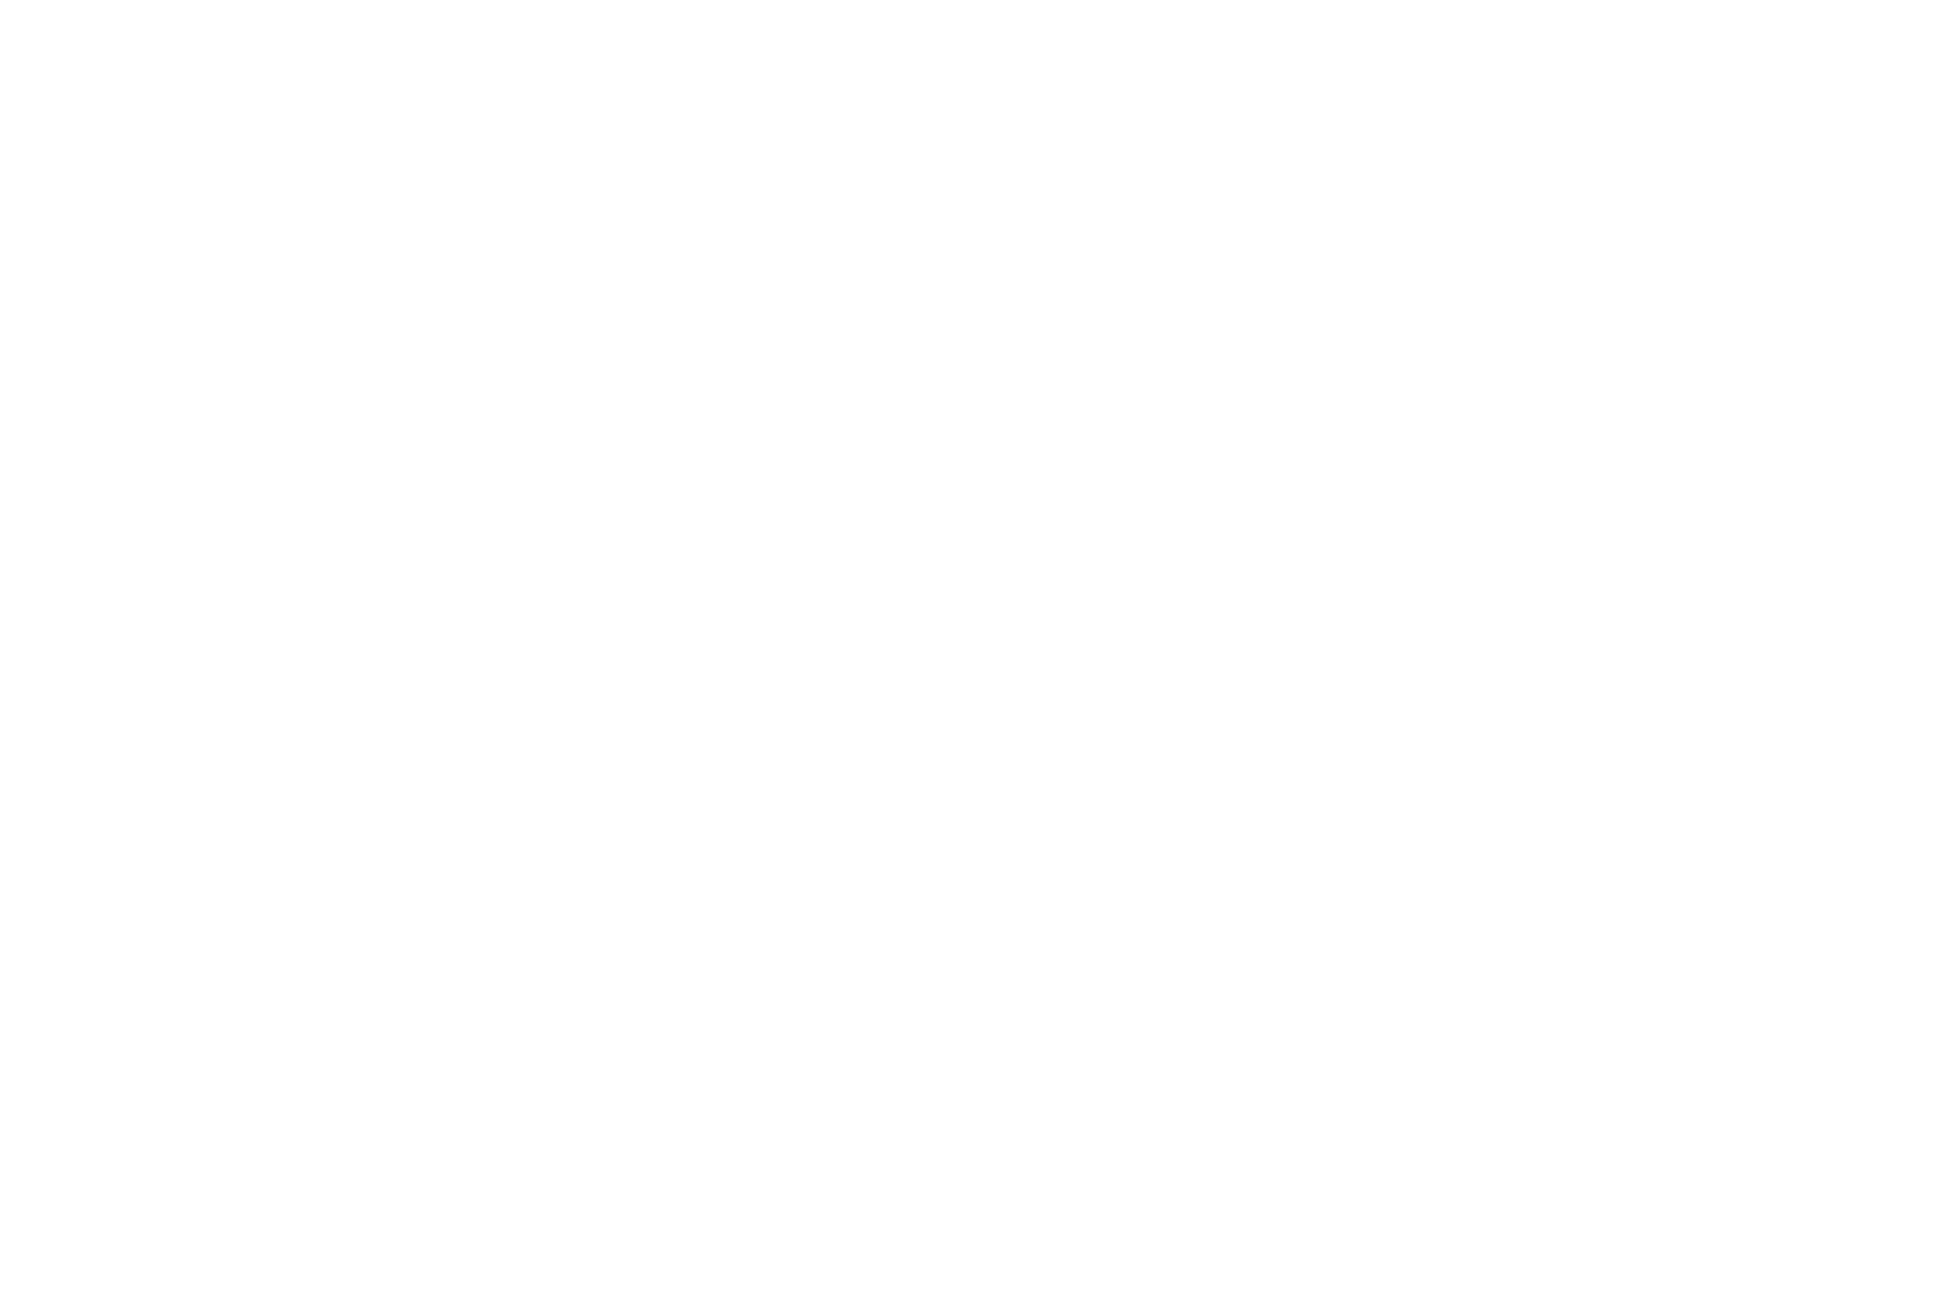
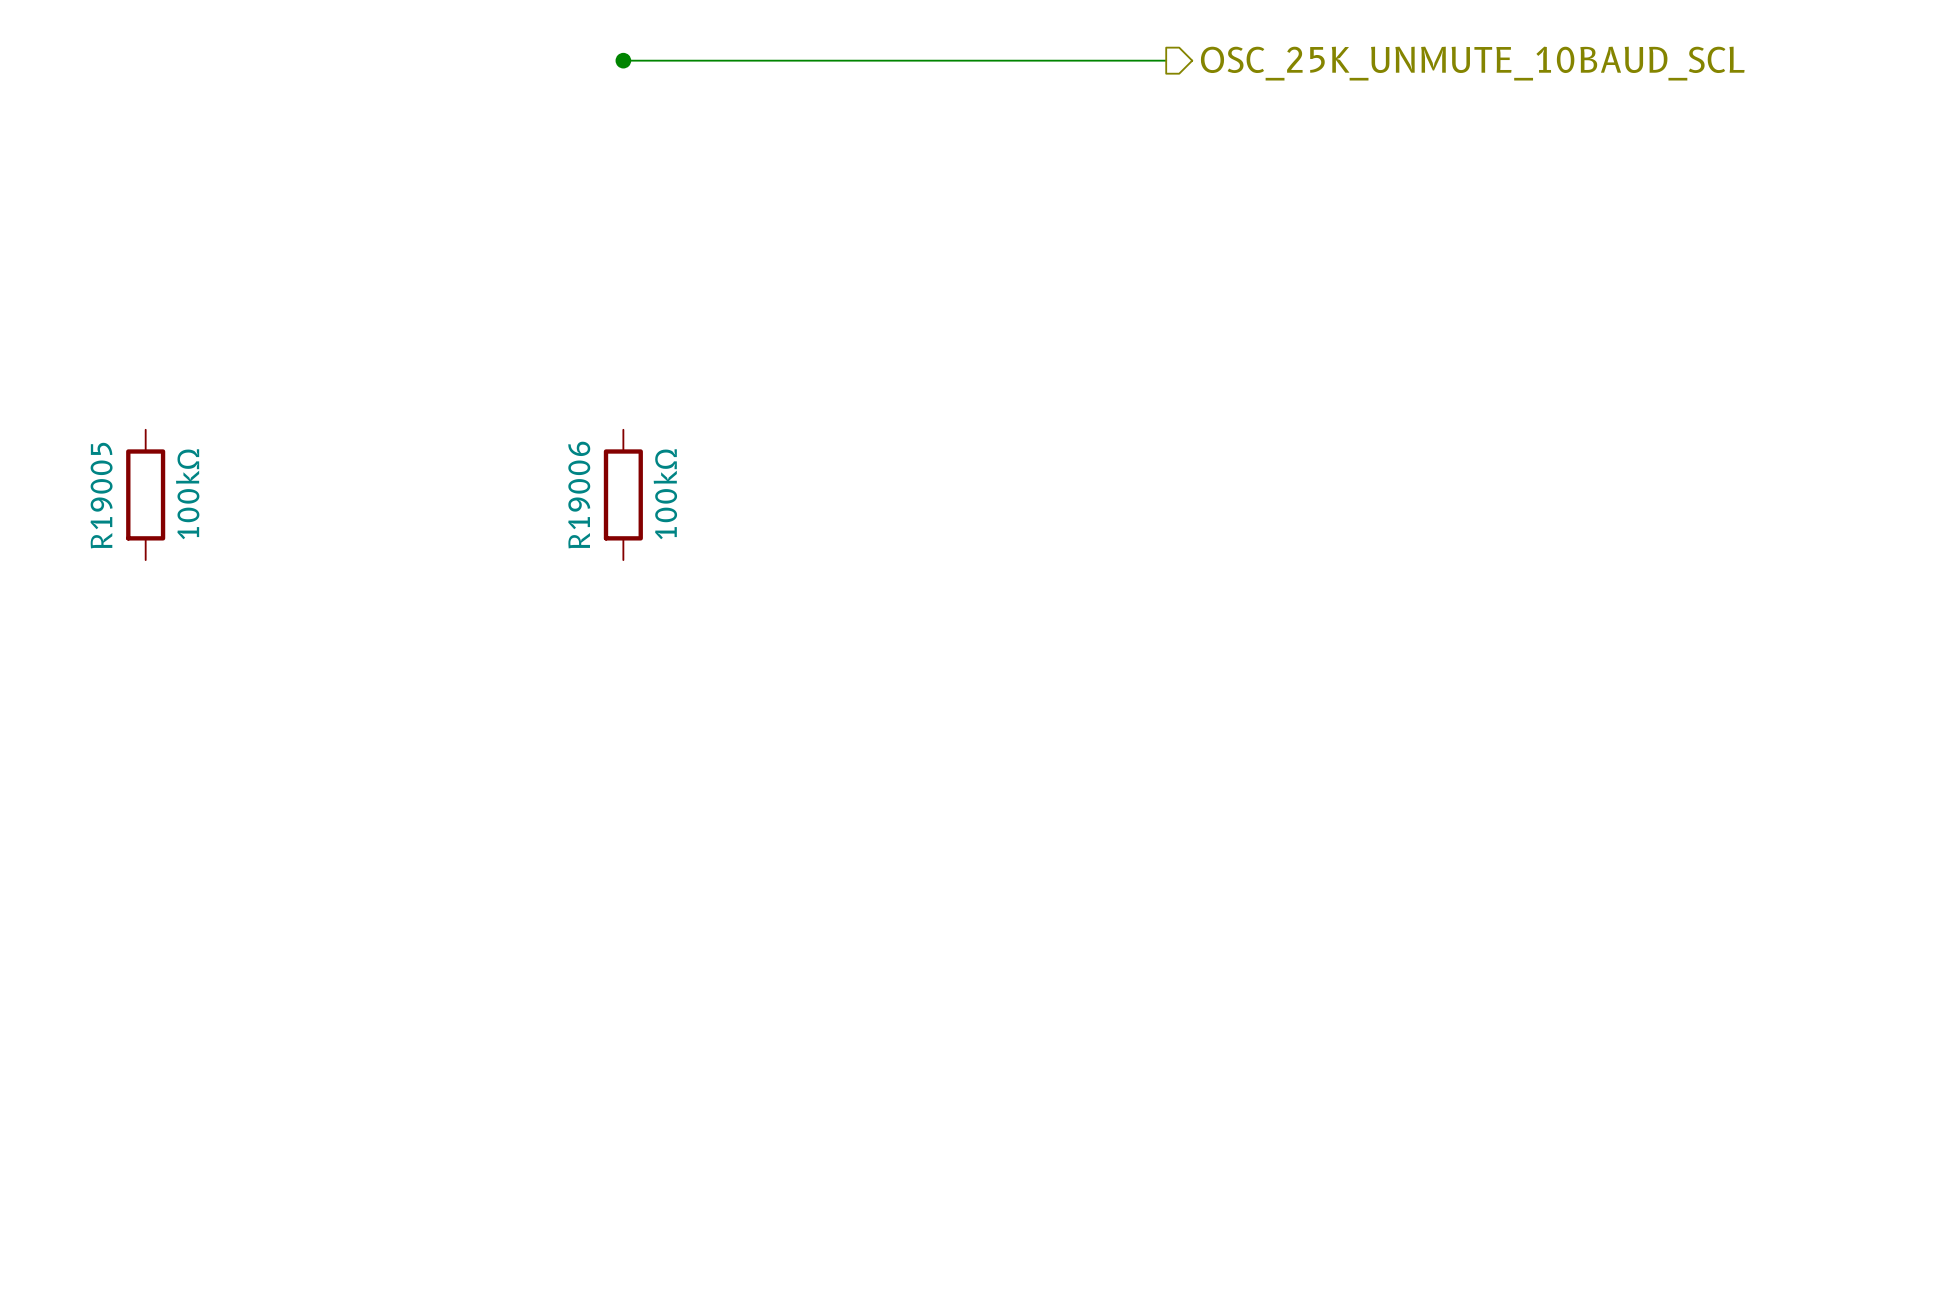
wire: none -> (623, 60) (1166, 60)
junction: none -> (623, 60)
hierarchical label: none -> OSC_25K_UNMUTE_10BAUD_SCL (1472, 63)
R19005: none -> 100kΩ (145, 494)
R19006: none -> 100kΩ (623, 494)

